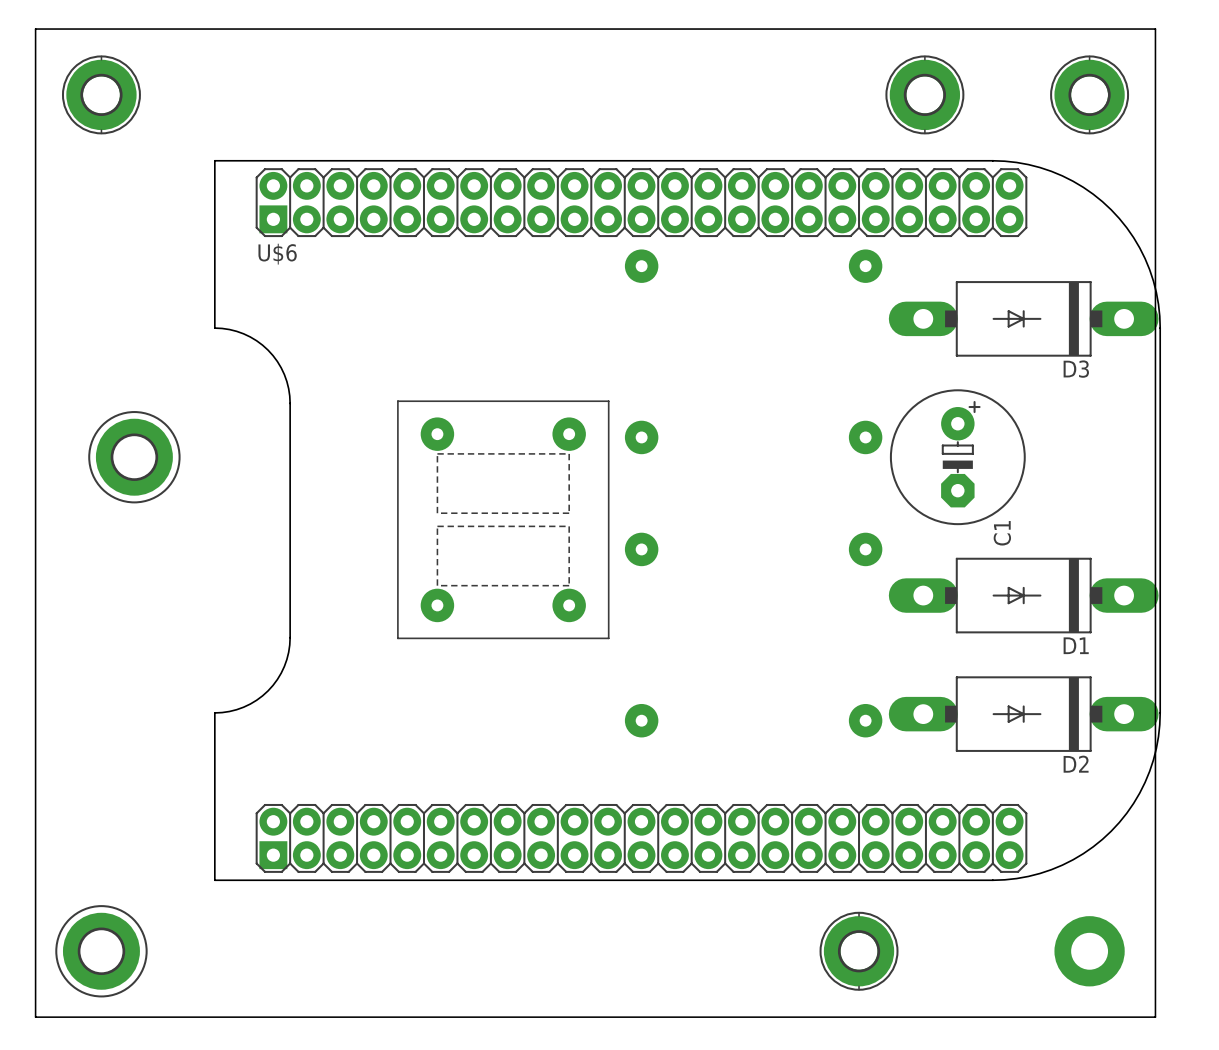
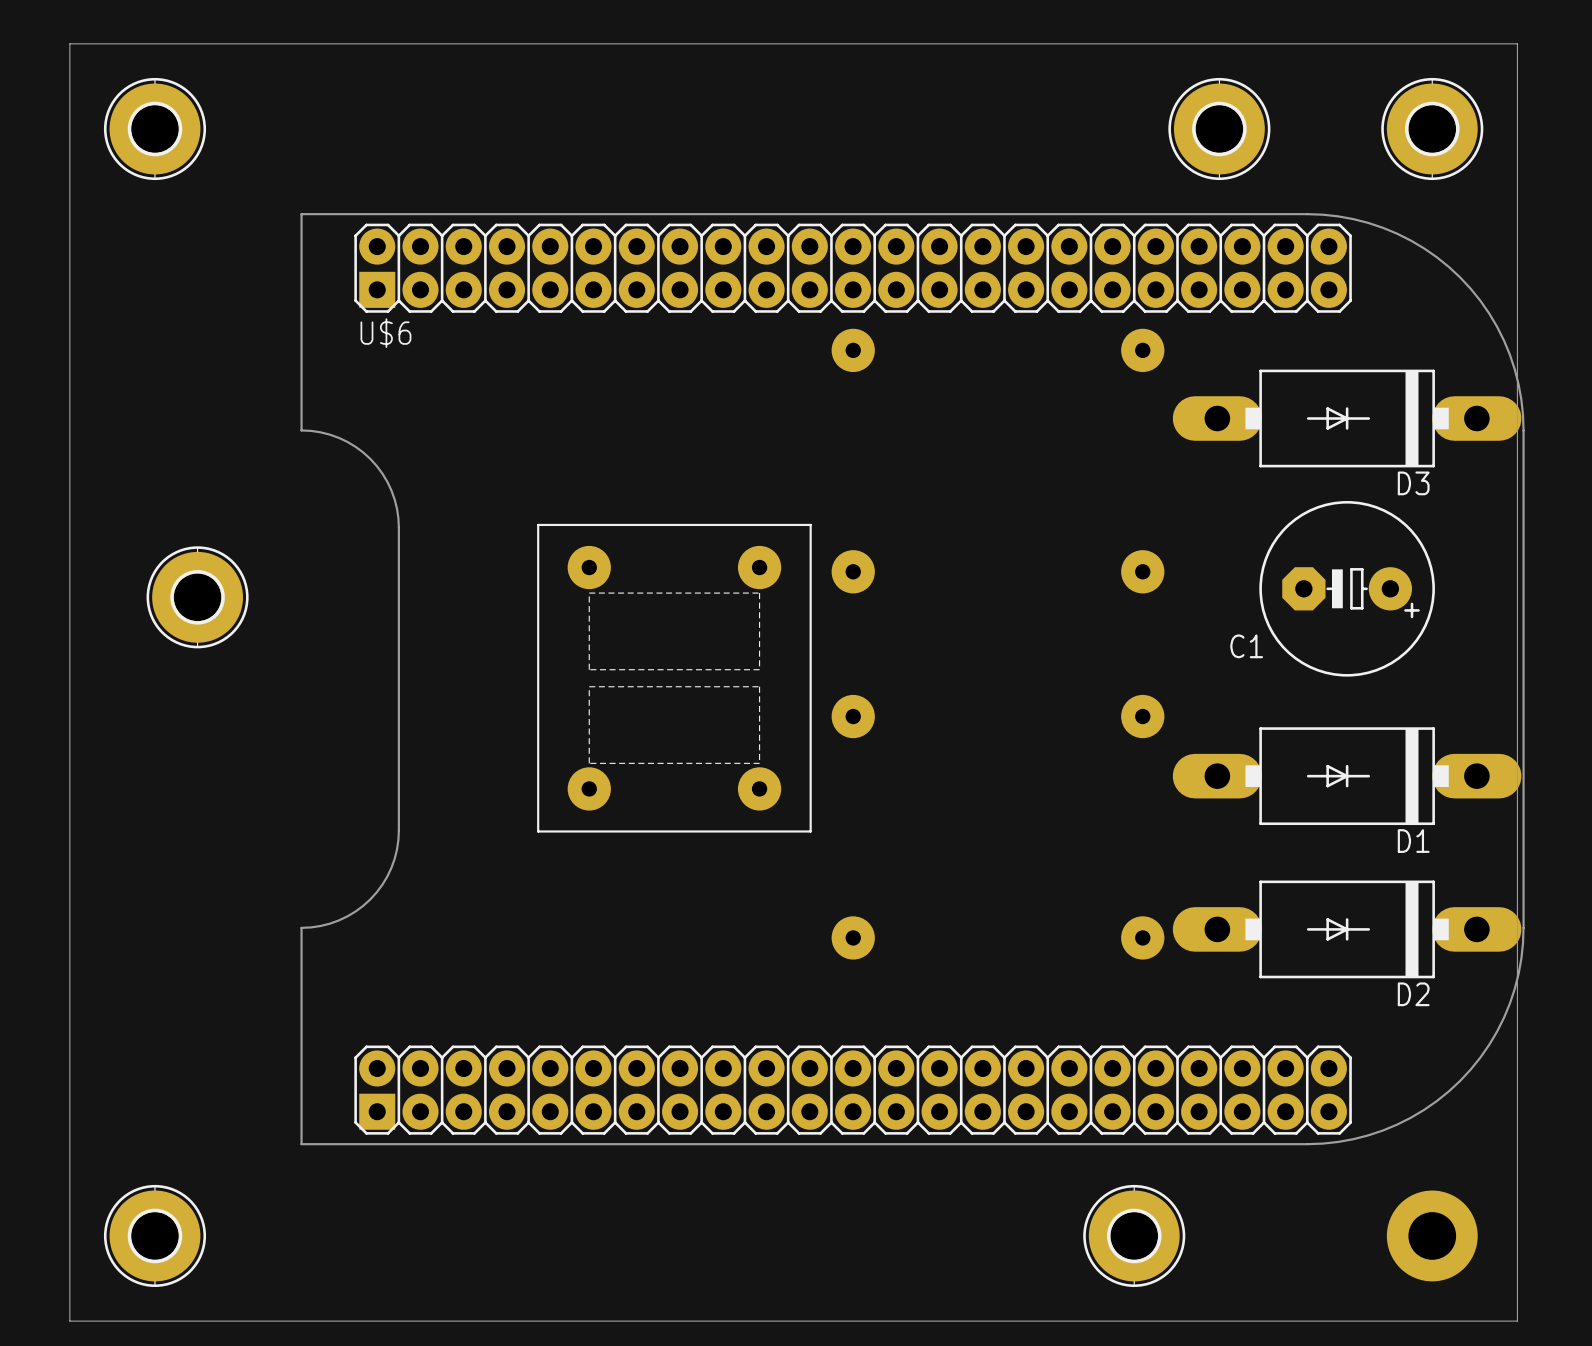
part footprint: [88, 411, 181, 504] -> [146, 546, 249, 649]
C1 rotation: 0° (957, 457) -> 90° clockwise (1347, 588)
part footprint: [55, 905, 148, 998] -> [103, 1184, 207, 1288]

